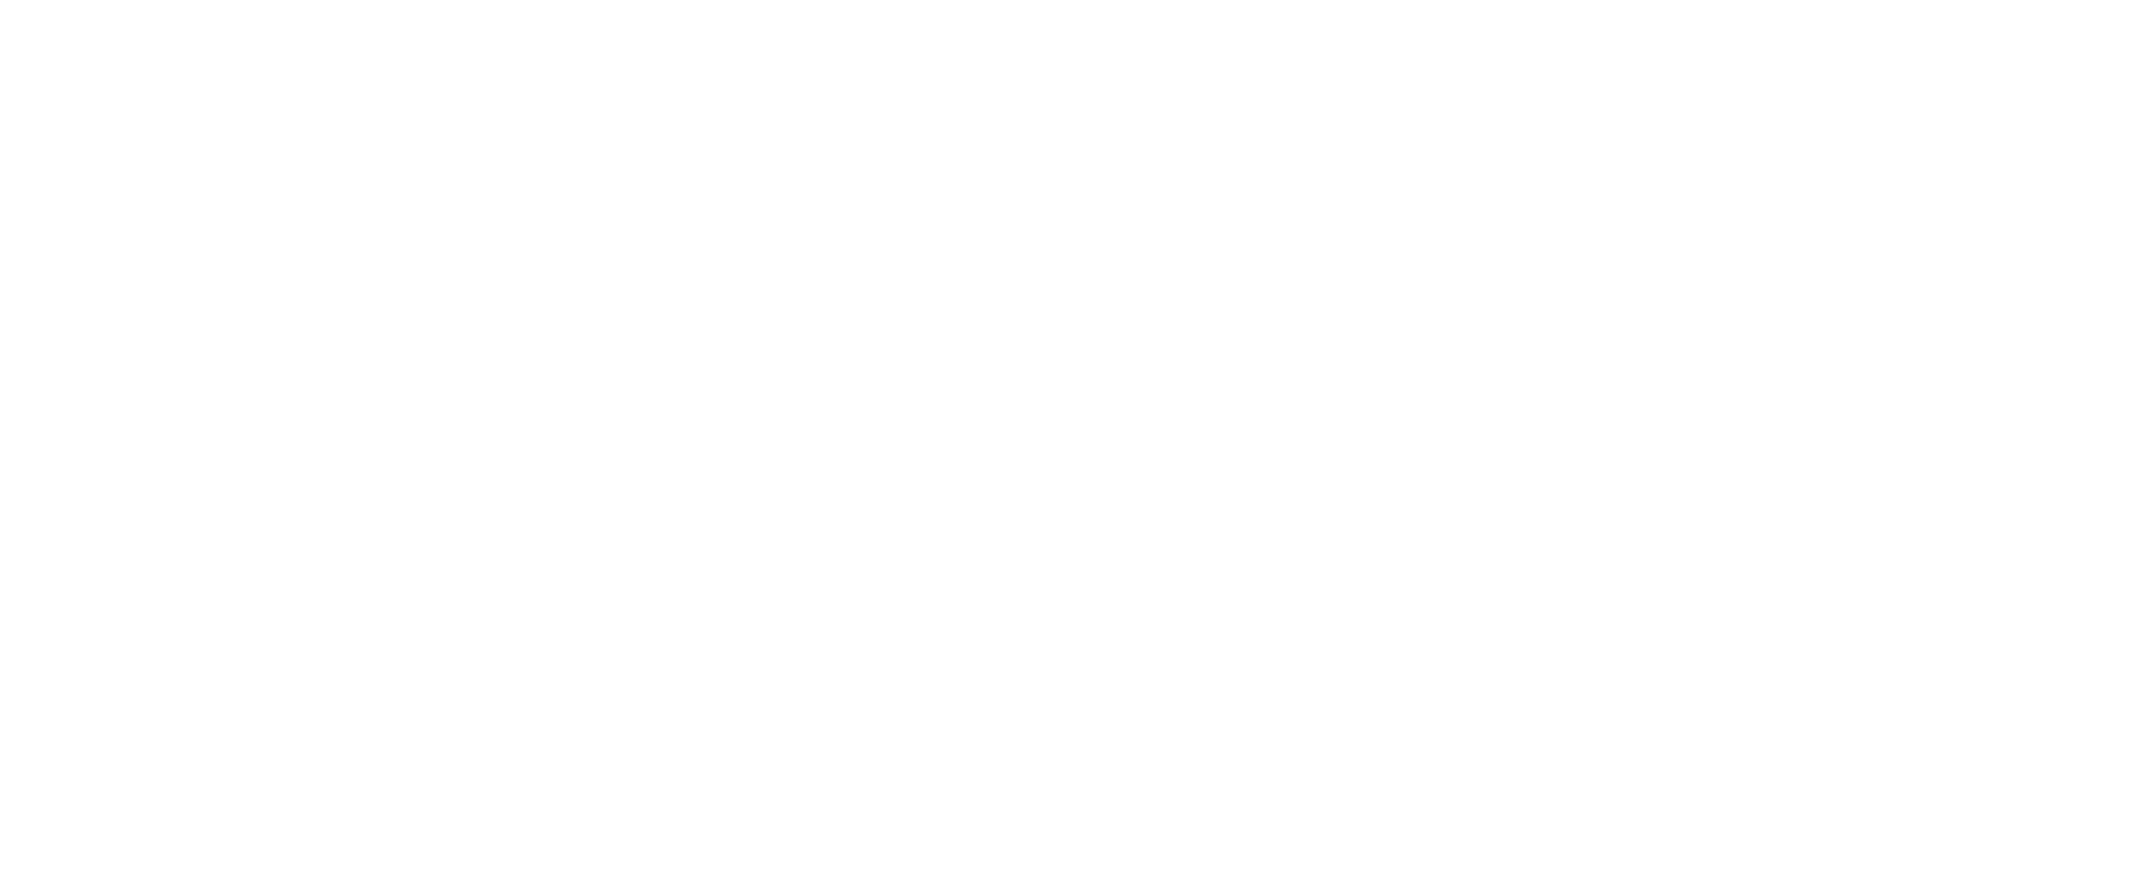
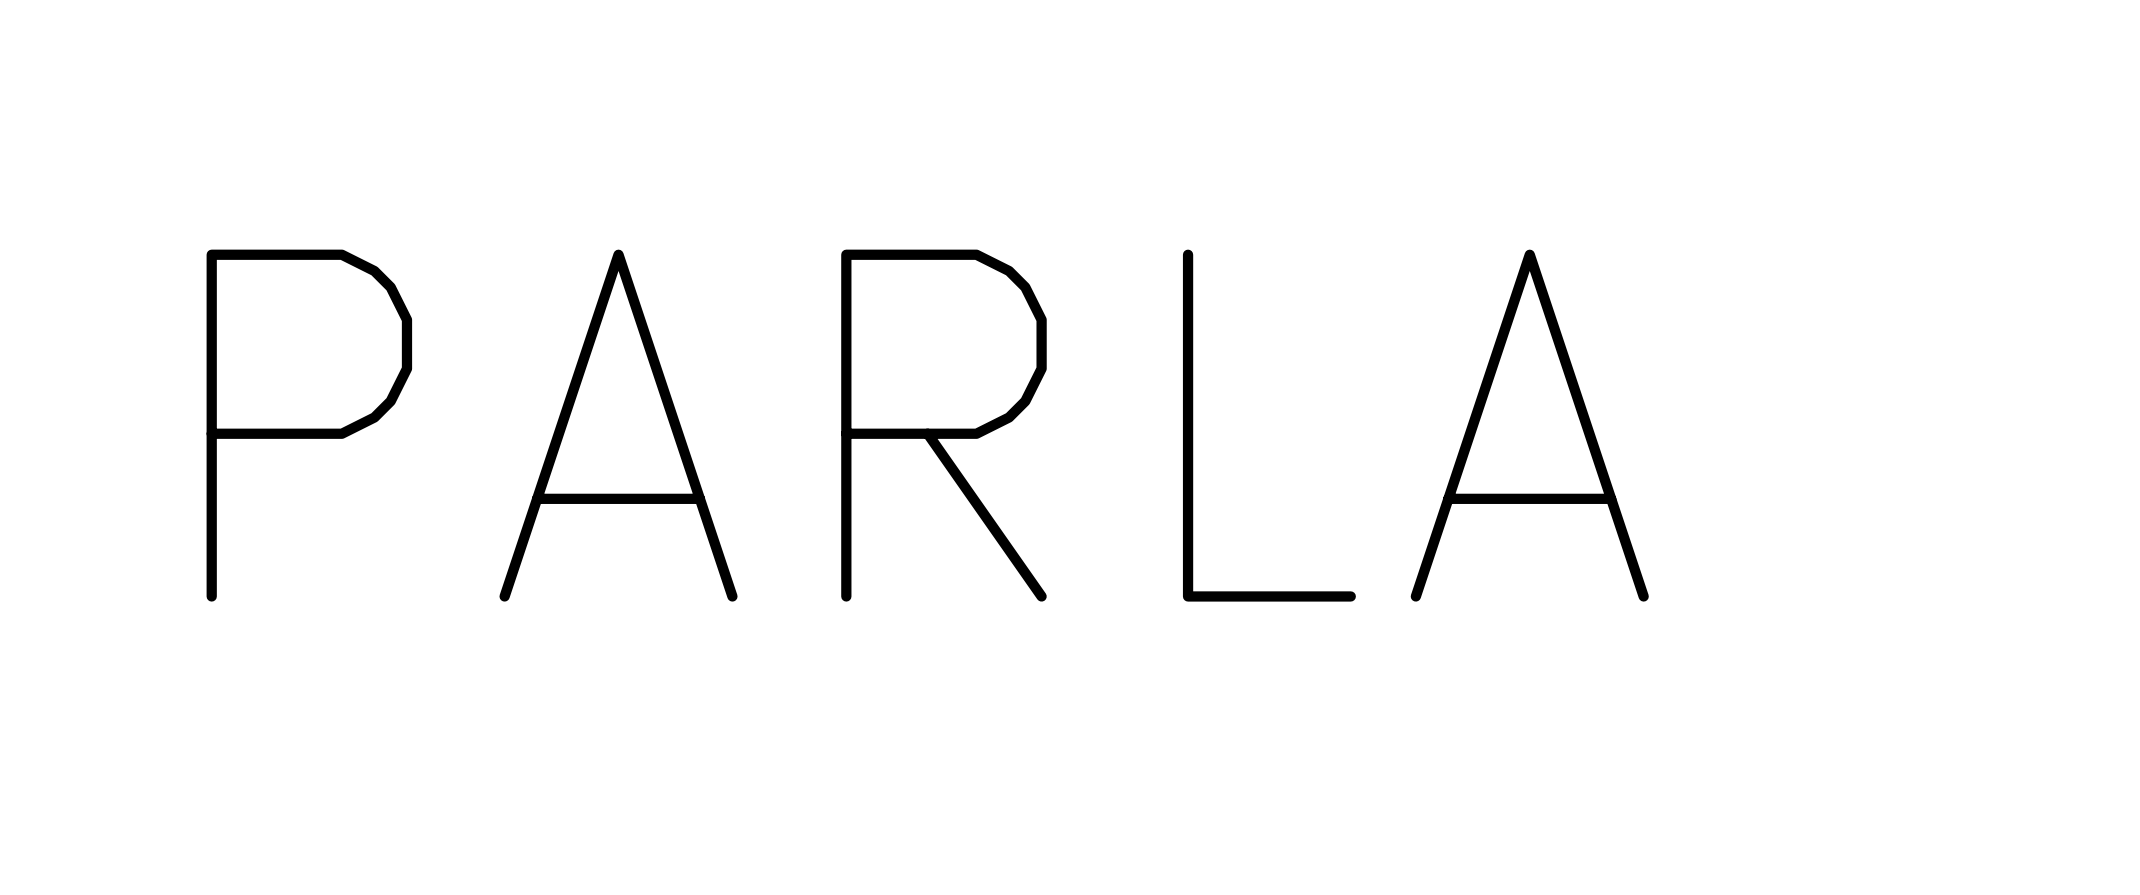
text: none -> PARLA (927, 425)

